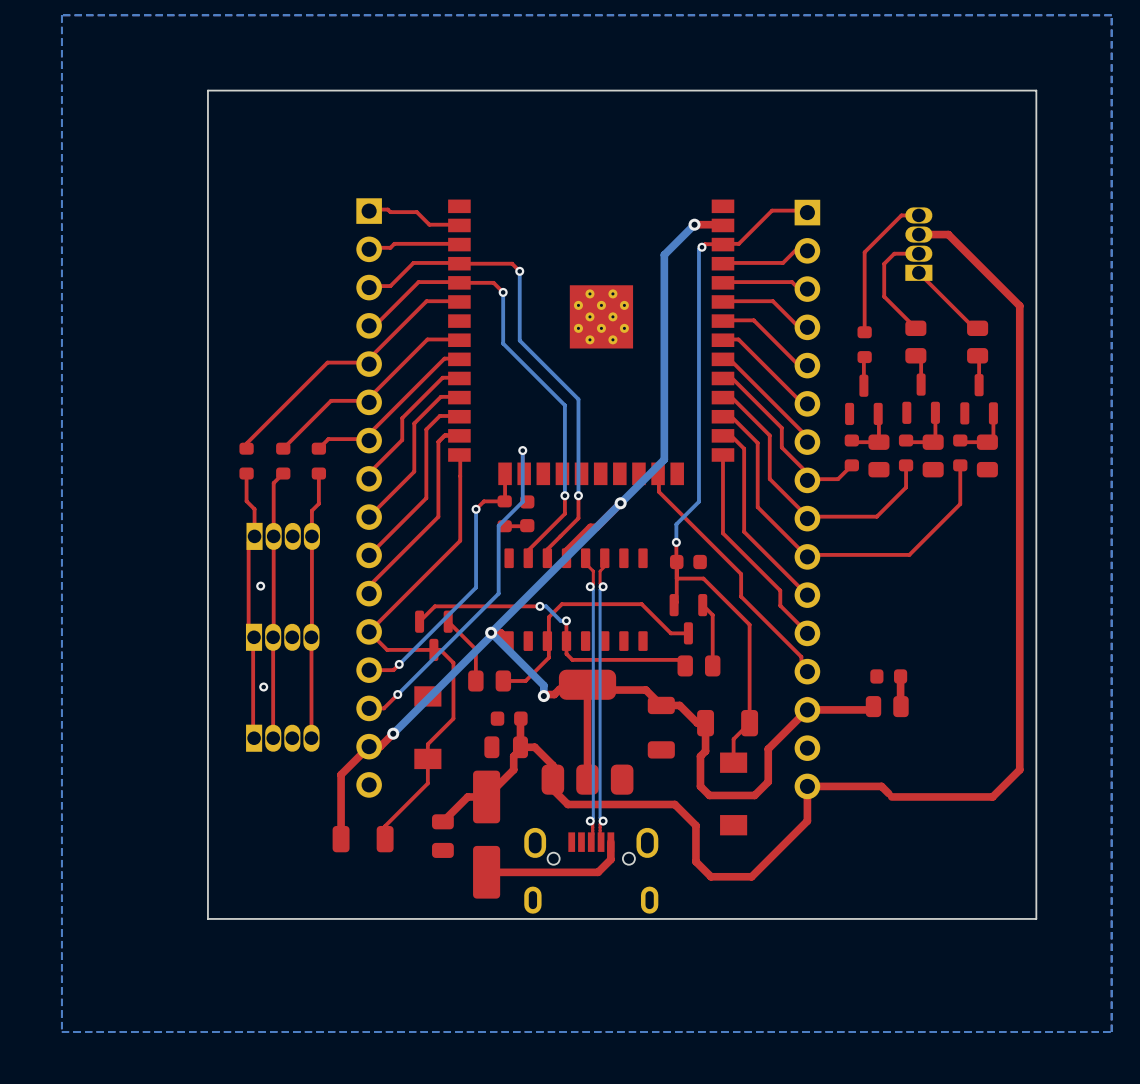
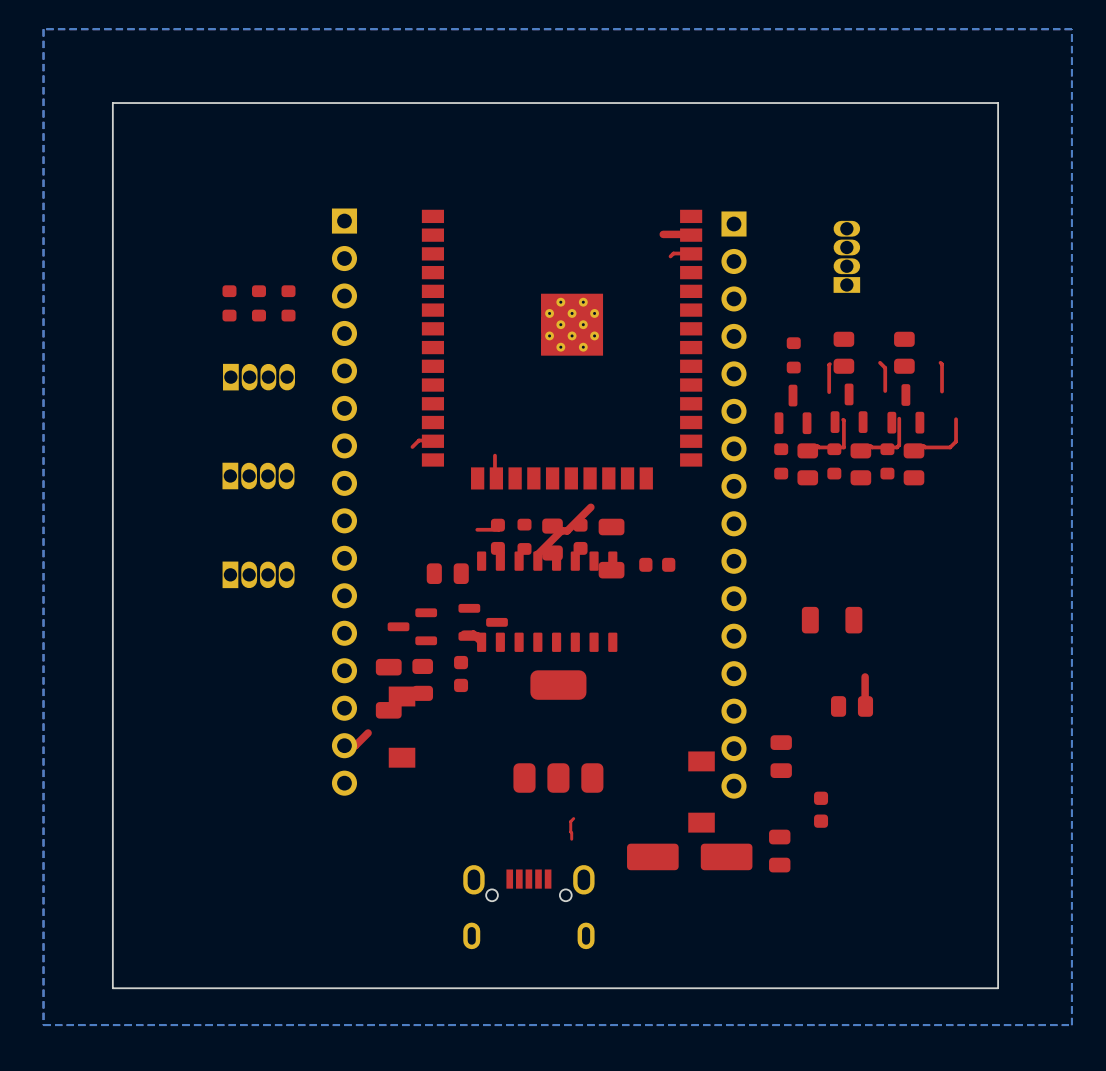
board edge: (207, 90) (207, 918) (1036, 918) -> (186, 103) (112, 103) (112, 988) (998, 988) (998, 914)
top track: (369, 211) (387, 209) (390, 212) (416, 212) (429, 224) (460, 224) -> none
top track: (807, 212) (805, 210) (772, 210) (738, 243) (723, 243) -> none
top track: (918, 215) (901, 215) (864, 252) (864, 332) -> none
bottom track: (694, 224) (664, 254) (664, 459) (491, 632) -> none
via: (694, 224) -> none
top track: (918, 234) (948, 234) (1019, 305) (1019, 769) (992, 796) (891, 796) -> none
top track: (460, 243) (394, 243) (390, 247) (369, 249) -> none
part position: (918, 244) -> (846, 256)
bottom track: (701, 247) (698, 249) (698, 501) (676, 524) (676, 542) -> none
via: (701, 247) -> none
top track: (807, 250) (805, 248) (797, 248) (783, 262) (723, 262) -> none
top track: (918, 253) (894, 253) (884, 263) (884, 296) (915, 328) -> none
top track: (460, 262) (413, 262) (390, 286) (369, 287) -> none
top track: (459, 263) (512, 263) (519, 271) -> none
bottom track: (519, 269) (519, 340) (578, 399) (578, 495) -> none
via: (519, 271) -> none
top track: (918, 272) (974, 328) (977, 328) -> none
top track: (459, 282) (493, 282) (503, 292) -> none
top track: (460, 282) (418, 282) (376, 324) (369, 325) -> none
top track: (723, 282) (792, 282) (797, 287) (805, 287) (807, 289) -> none
bottom track: (503, 292) (503, 343) (564, 405) (564, 495) -> none
via: (503, 292) -> none
part: none -> (229, 303)
part: none -> (258, 303)
part: none -> (288, 303)
top track: (460, 301) (426, 301) (368, 359) (368, 363) -> none
top track: (723, 301) (772, 301) (797, 325) (805, 325) (807, 327) -> none
top track: (723, 320) (753, 320) (797, 363) (805, 363) (807, 365) -> none
part footprint: [857, 326, 872, 364] -> [833, 331, 855, 374]
top track: (460, 339) (427, 339) (368, 398) (368, 401) -> none
top track: (723, 339) (738, 339) (802, 403) (807, 403) -> none
part: (915, 342) -> none
part: (977, 342) -> none
part: none -> (904, 352)
part: none -> (793, 355)
top track: (460, 358) (444, 358) (368, 434) (368, 440) -> none
top track: (723, 358) (729, 358) (807, 436) (807, 442) -> none
top track: (369, 364) (327, 362) (246, 443) (246, 448) -> none
part: none -> (258, 377)
top track: (460, 377) (442, 377) (402, 418) (402, 440) (368, 473) (369, 478) -> none
top track: (723, 377) (731, 377) (781, 427) (781, 447) (807, 473) (807, 480) -> none
top track: (460, 396) (440, 396) (414, 423) (414, 471) (369, 517) -> none
top track: (723, 396) (731, 396) (769, 435) (769, 479) (807, 518) (809, 516) (876, 516) (906, 487) (906, 465) -> none
part: (921, 398) -> none
part: (863, 399) -> none
part: (979, 399) -> none
top track: (369, 402) (331, 400) (283, 448) -> none
part: none -> (849, 408)
part: none -> (905, 408)
part: none -> (793, 409)
top track: (460, 415) (439, 415) (426, 429) (426, 498) (369, 555) (369, 553) -> none
top track: (723, 415) (730, 415) (757, 443) (757, 507) (807, 556) (809, 554) (909, 554) (960, 504) (960, 465) -> none
top track: (459, 435) (444, 435) (438, 441) (438, 516) (369, 586) (369, 593) -> none
top track: (723, 435) (730, 435) (744, 448) (744, 531) (807, 595) -> none
top track: (369, 440) (328, 439) (318, 448) -> none
part footprint: [276, 442, 291, 480] -> [222, 462, 295, 490]
bottom track: (522, 450) (522, 501) (498, 525) (498, 593) (397, 694) -> none
via: (522, 450) -> none
part position: (851, 452) -> (834, 461)
part position: (906, 452) -> (887, 461)
part: (960, 452) -> none
top track: (460, 454) (460, 540) (369, 631) -> none
top track: (722, 454) (722, 533) (780, 590) (780, 605) (807, 633) (805, 631) (797, 631) -> none
part position: (878, 455) -> (860, 464)
part position: (933, 455) -> (913, 464)
part: (987, 455) -> none
part: none -> (781, 461)
part: none -> (807, 464)
part: (246, 461) -> none
part: (318, 461) -> none
top track: (851, 465) (838, 479) (807, 479) -> none
top track: (246, 473) (246, 501) (254, 509) (254, 536) (248, 542) (248, 631) (254, 637) (254, 738) -> none
top track: (283, 473) (273, 483) (273, 738) -> none
top track: (318, 473) (318, 503) (311, 510) (311, 738) -> none
top track: (505, 473) (505, 501) (483, 501) (476, 509) -> none
top track: (658, 473) (658, 491) (741, 574) (741, 596) (801, 656) (801, 665) (807, 671) (807, 669) -> none
top track: (564, 495) (564, 513) (528, 550) (528, 558) -> none
via: (564, 495) -> none
top track: (578, 495) (578, 518) (547, 549) (547, 558) -> none
via: (578, 495) -> none
part position: (807, 499) -> (733, 505)
via: (620, 503) -> none
bottom track: (476, 509) (476, 587) (399, 664) -> none
via: (476, 509) -> none
part position: (504, 513) -> (524, 536)
part position: (527, 513) -> (497, 536)
part: none -> (580, 536)
part: (283, 536) -> none
part: none -> (552, 539)
top track: (676, 542) (676, 602) (674, 605) -> none
via: (676, 542) -> none
part: none -> (611, 548)
top track: (587, 565) (593, 571) (593, 583) (590, 586) -> none
top track: (606, 565) (600, 571) (600, 583) (603, 586) -> none
part: none -> (447, 573)
part: none -> (258, 574)
top track: (676, 578) (703, 578) (749, 624) (749, 723) (733, 739) (733, 762) -> none
via: (260, 586) -> none
bottom track: (590, 586) (593, 589) (593, 818) (590, 821) -> none
via: (590, 586) -> none
bottom track: (603, 586) (600, 589) (600, 818) (603, 821) -> none
via: (603, 586) -> none
top track: (702, 605) (712, 615) (712, 665) -> none
top track: (539, 606) (434, 606) (419, 621) -> none
bottom track: (539, 606) (546, 606) (560, 620) (566, 620) -> none
via: (539, 606) -> none
part: (688, 619) -> none
part: none -> (483, 622)
top track: (566, 620) (566, 632) -> none
via: (566, 620) -> none
top track: (448, 621) (475, 649) (475, 680) -> none
top track: (369, 631) (387, 649) (440, 649) (453, 662) (453, 718) (427, 744) (427, 783) (385, 826) (385, 839) -> none
bottom track: (491, 632) (491, 635) (393, 733) -> none
bottom track: (491, 632) (543, 685) (543, 696) -> none
via: (491, 632) -> none
top track: (566, 632) (566, 653) (572, 659) (679, 659) (685, 665) -> none
top track: (688, 633) (670, 633) (641, 604) (561, 604) (548, 617) (548, 657) (525, 680) (503, 680) -> none
part rotation: 0° (433, 635) -> 90° clockwise (412, 626)
part: (282, 637) -> none
top track: (399, 664) (393, 670) (369, 670) (370, 668) -> none
via: (399, 664) -> none
part: (698, 665) -> none
part footprint: [468, 670, 512, 692] -> [454, 655, 469, 693]
part: (888, 676) -> none
part: none -> (422, 679)
via: (263, 687) -> none
part: none -> (388, 688)
top track: (587, 689) (645, 690) (661, 705) (679, 705) (697, 723) (705, 723) (705, 751) (700, 756) (700, 786) (709, 795) (754, 795) (768, 781) (768, 749) (807, 709) -> none
top track: (397, 694) (383, 708) (369, 708) (370, 706) -> none
via: (397, 694) -> none
top track: (543, 696) (554, 694) (559, 689) (582, 689) (587, 684) (587, 779) -> none
via: (543, 696) -> none
top track: (873, 706) (870, 709) (807, 709) -> none
part rotation: 0° (509, 718) -> 90° clockwise (821, 809)
part position: (509, 718) -> (821, 809)
top track: (520, 718) (520, 749) (513, 756) (513, 769) (486, 796) (467, 796) (442, 821) -> none
part: (727, 723) -> none
part rotation: 0° (661, 727) -> 90° clockwise (832, 620)
part position: (661, 727) -> (832, 620)
via: (393, 733) -> none
part: (282, 738) -> none
top track: (370, 745) (341, 774) (341, 839) -> none
part: (506, 747) -> none
top track: (520, 747) (534, 747) (552, 765) (552, 789) (567, 804) (674, 804) (695, 825) (695, 861) (711, 876) (751, 876) (807, 821) (807, 786) -> none
part: none -> (781, 756)
top track: (807, 786) (881, 786) (888, 793) -> none
top track: (590, 821) (592, 823) (591, 835) -> none
via: (590, 821) -> none
via: (603, 821) -> none
part rotation: 0° (486, 834) -> 90° clockwise (689, 856)
part position: (486, 834) -> (689, 856)
part: (442, 836) -> none
part: (363, 839) -> none
top track: (610, 842) (610, 859) (598, 872) (486, 872) -> none
part: none -> (779, 851)
part position: (591, 870) -> (528, 907)

